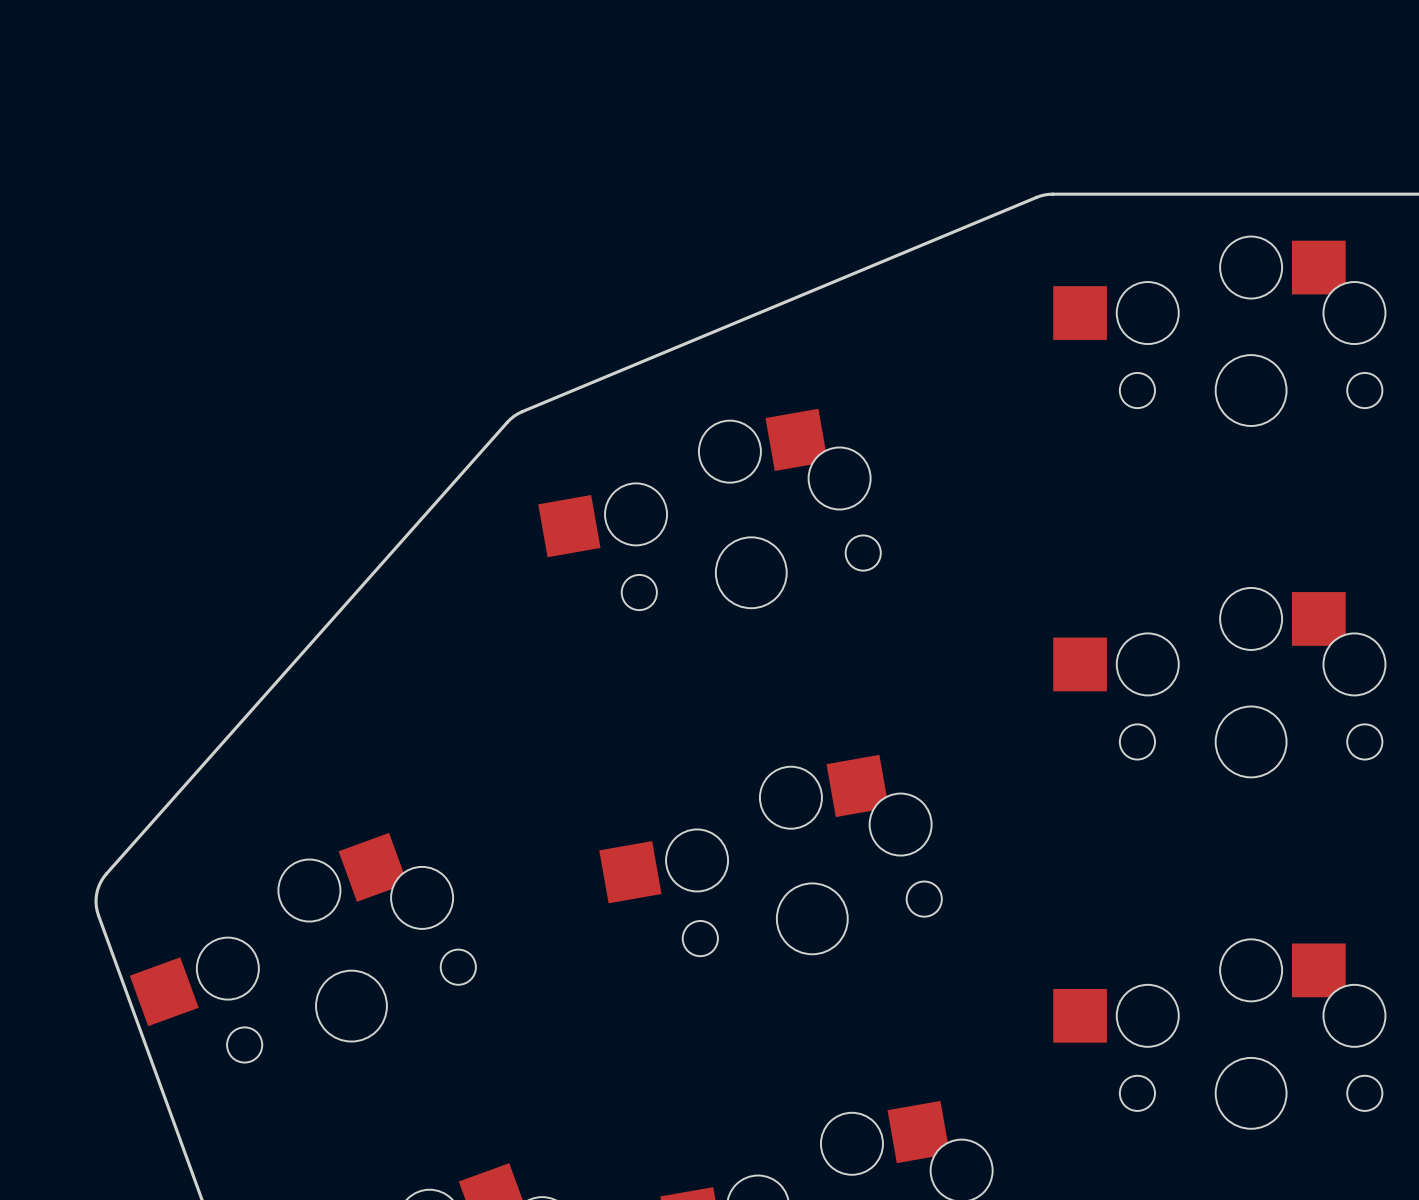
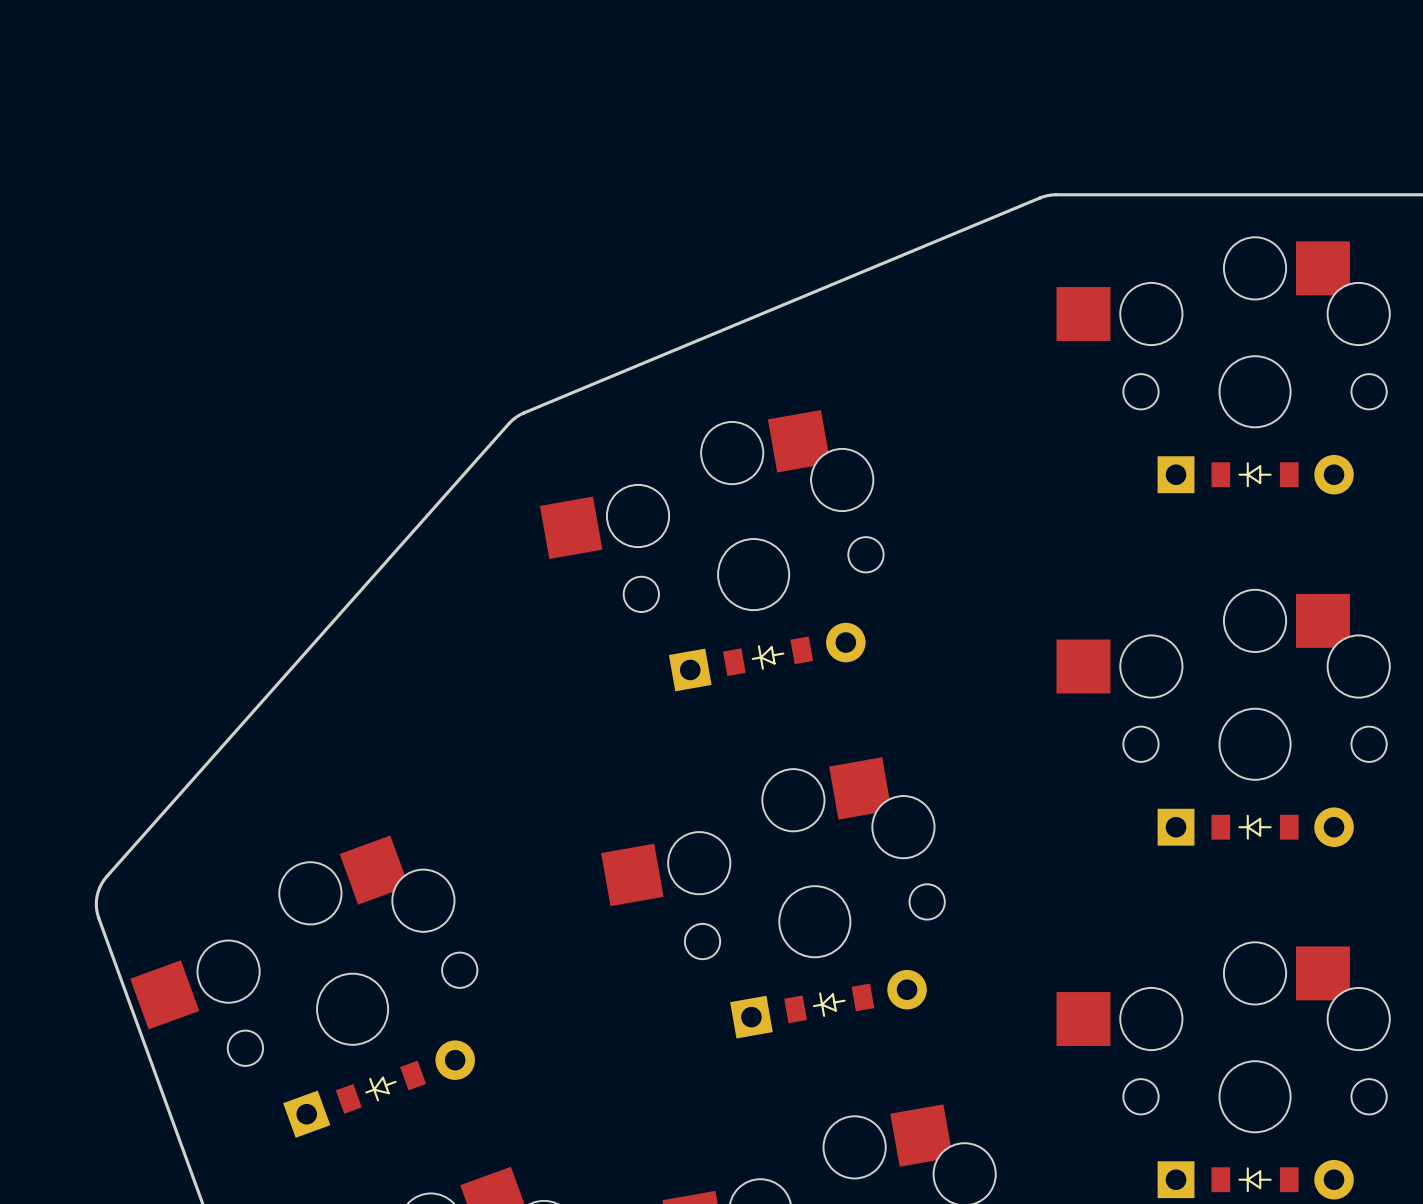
part: none -> (1255, 474)
part: none -> (767, 657)
part: none -> (1255, 827)
part: none -> (828, 1004)
part: none -> (379, 1089)
part: none -> (1255, 1179)

